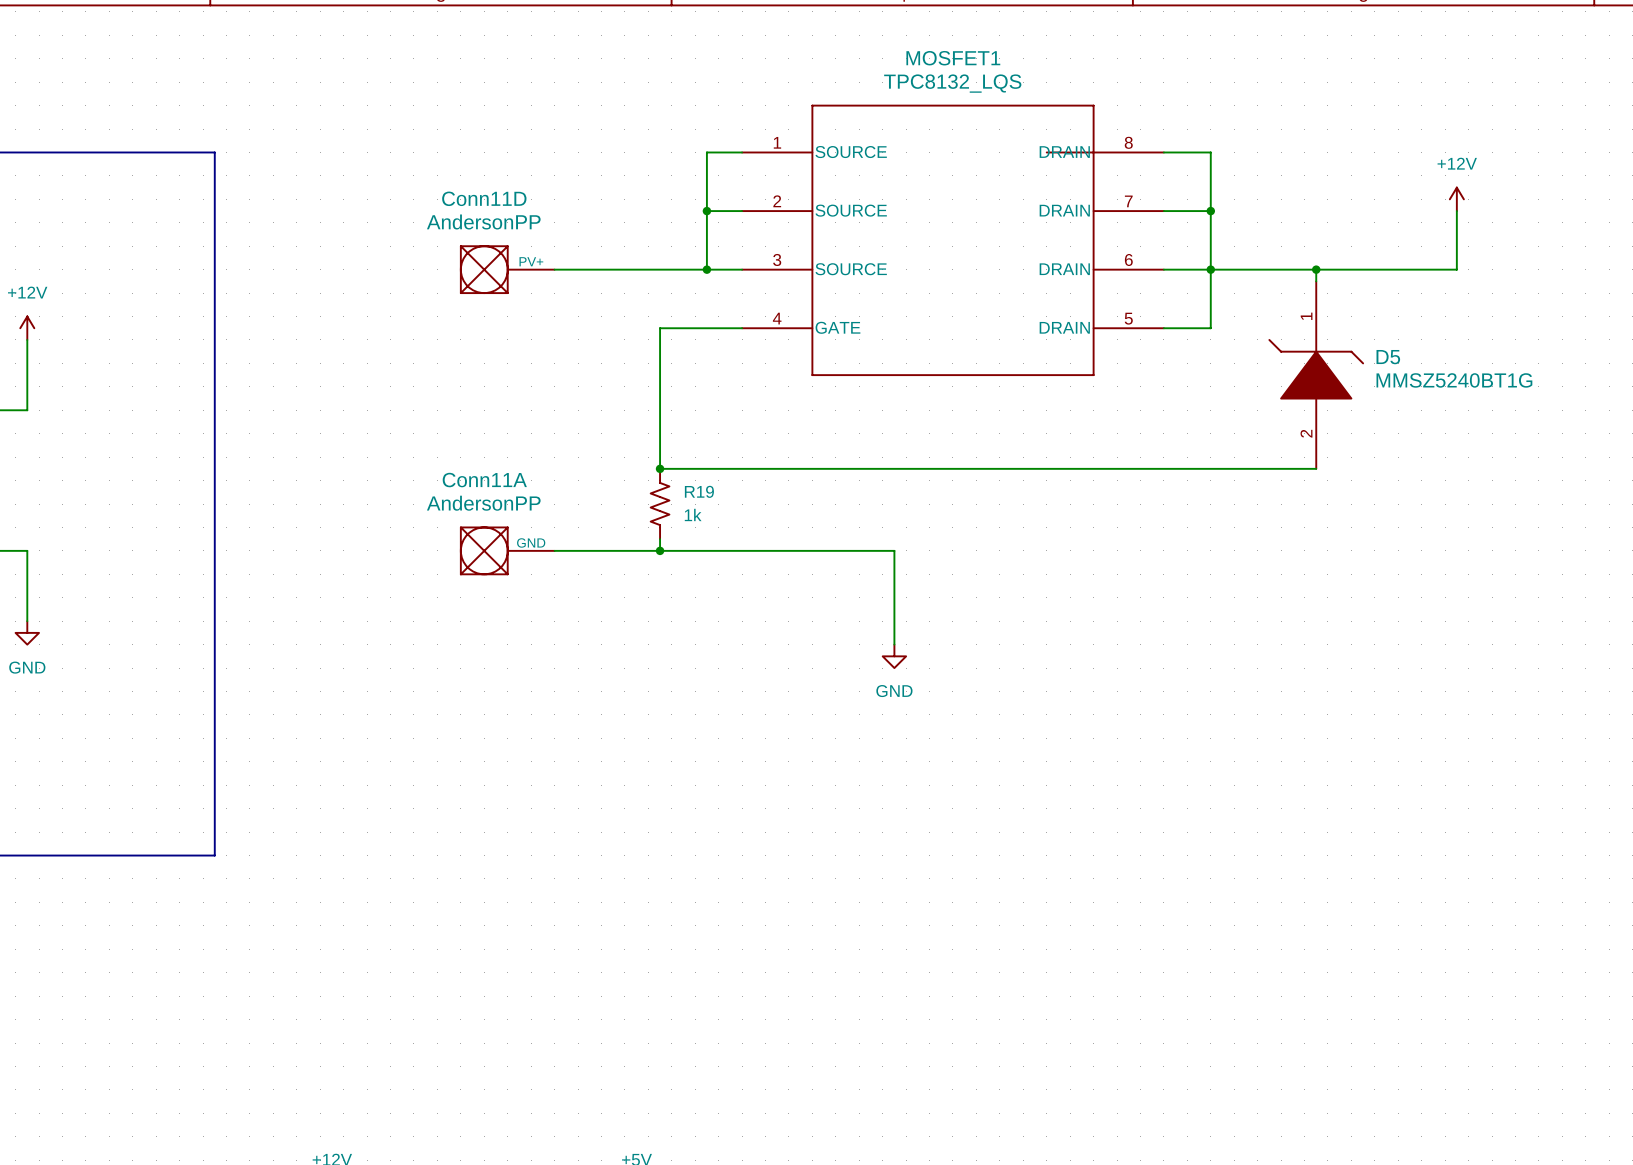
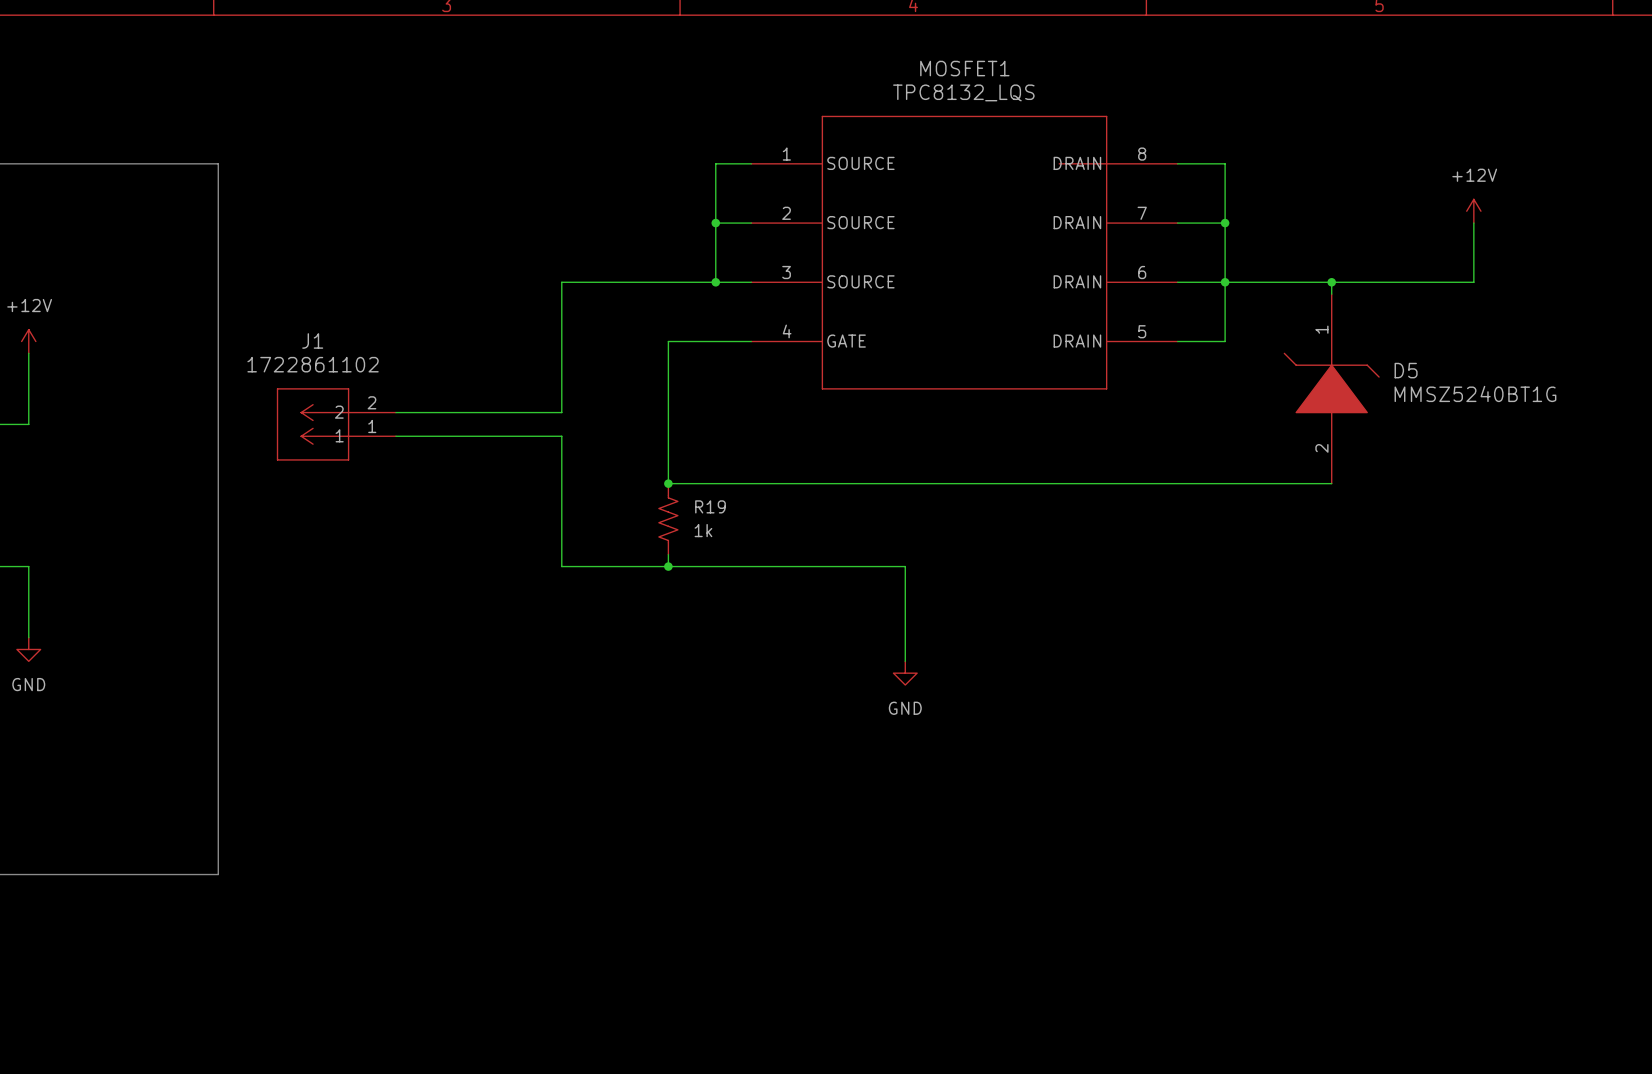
Conn11D: AndersonPP (507, 269) -> none
wire: none -> (561, 282) (561, 412) (395, 412)
J1: none -> 1722861102 (336, 424)
wire: none -> (395, 436) (561, 436) (561, 566)
Conn11A: AndersonPP (507, 550) -> none

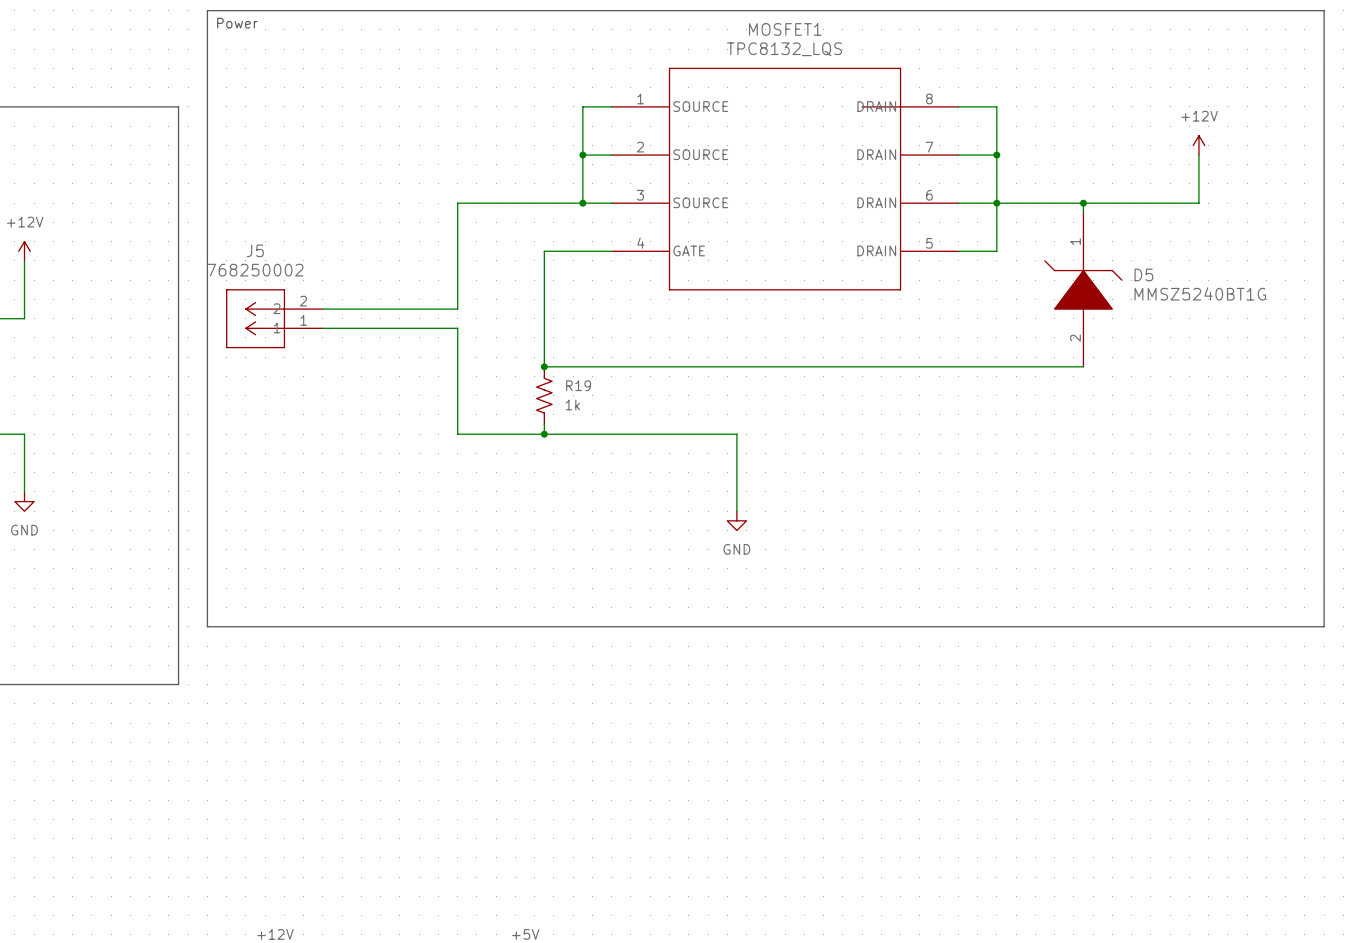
line: none -> (207, 10) (1324, 10) (1324, 626) (207, 626) (207, 10)
text: none -> Power (237, 23)
J1 name: J1 (312, 340) -> J5 (255, 250)
J1 value: 1722861102 (313, 364) -> 768250002 (255, 270)

